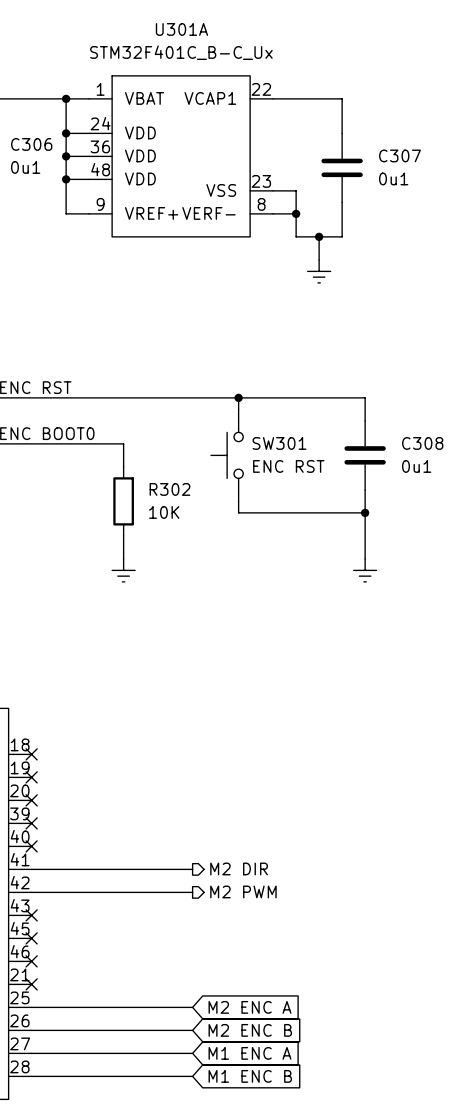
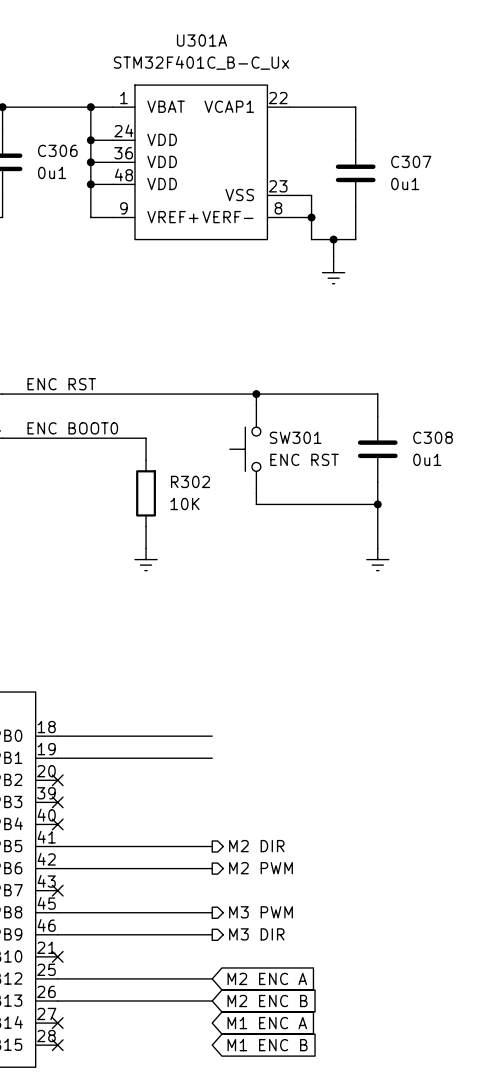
wire: none -> (57, 736) (212, 736)
no-connect mark: (31, 754) -> none
wire: none -> (57, 758) (212, 758)
no-connect mark: (31, 777) -> none
hierarchical label: none -> M3 PWM (261, 912)
no-connect mark: (31, 938) -> none
hierarchical label: none -> M3 DIR (256, 934)
no-connect mark: (31, 961) -> none
wire: (31, 1053) (192, 1053) -> (57, 912) (212, 912)
no-connect mark: none -> (57, 1023)
wire: (31, 1076) (192, 1076) -> (57, 934) (212, 934)
no-connect mark: none -> (57, 1045)

